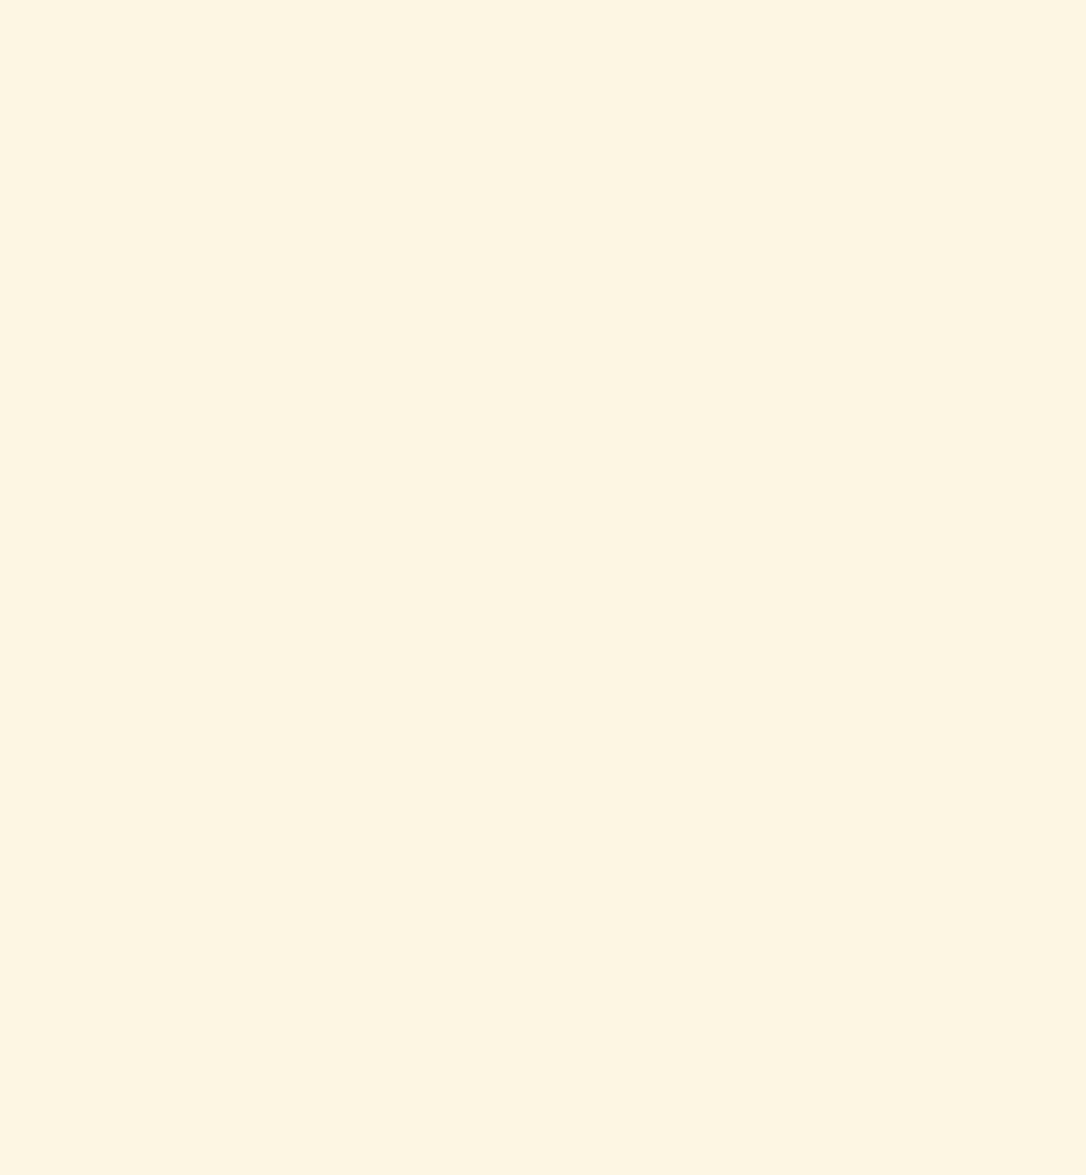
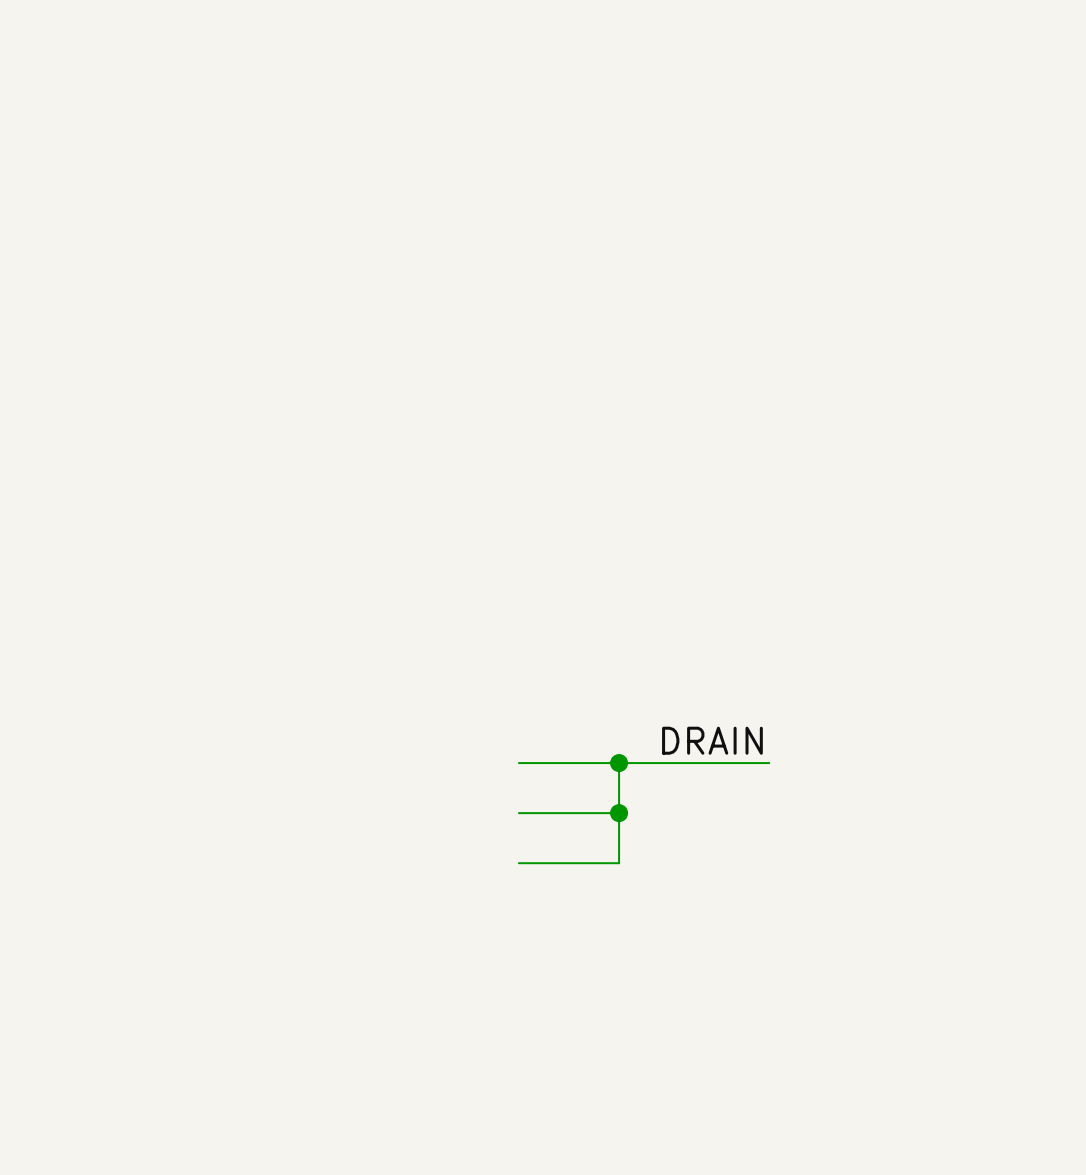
label: none -> DRAIN (712, 740)
wire: none -> (518, 763) (769, 763)
wire: none -> (619, 763) (619, 863) (518, 863)
junction: none -> (619, 763)
wire: none -> (518, 813) (619, 813)
junction: none -> (619, 813)

